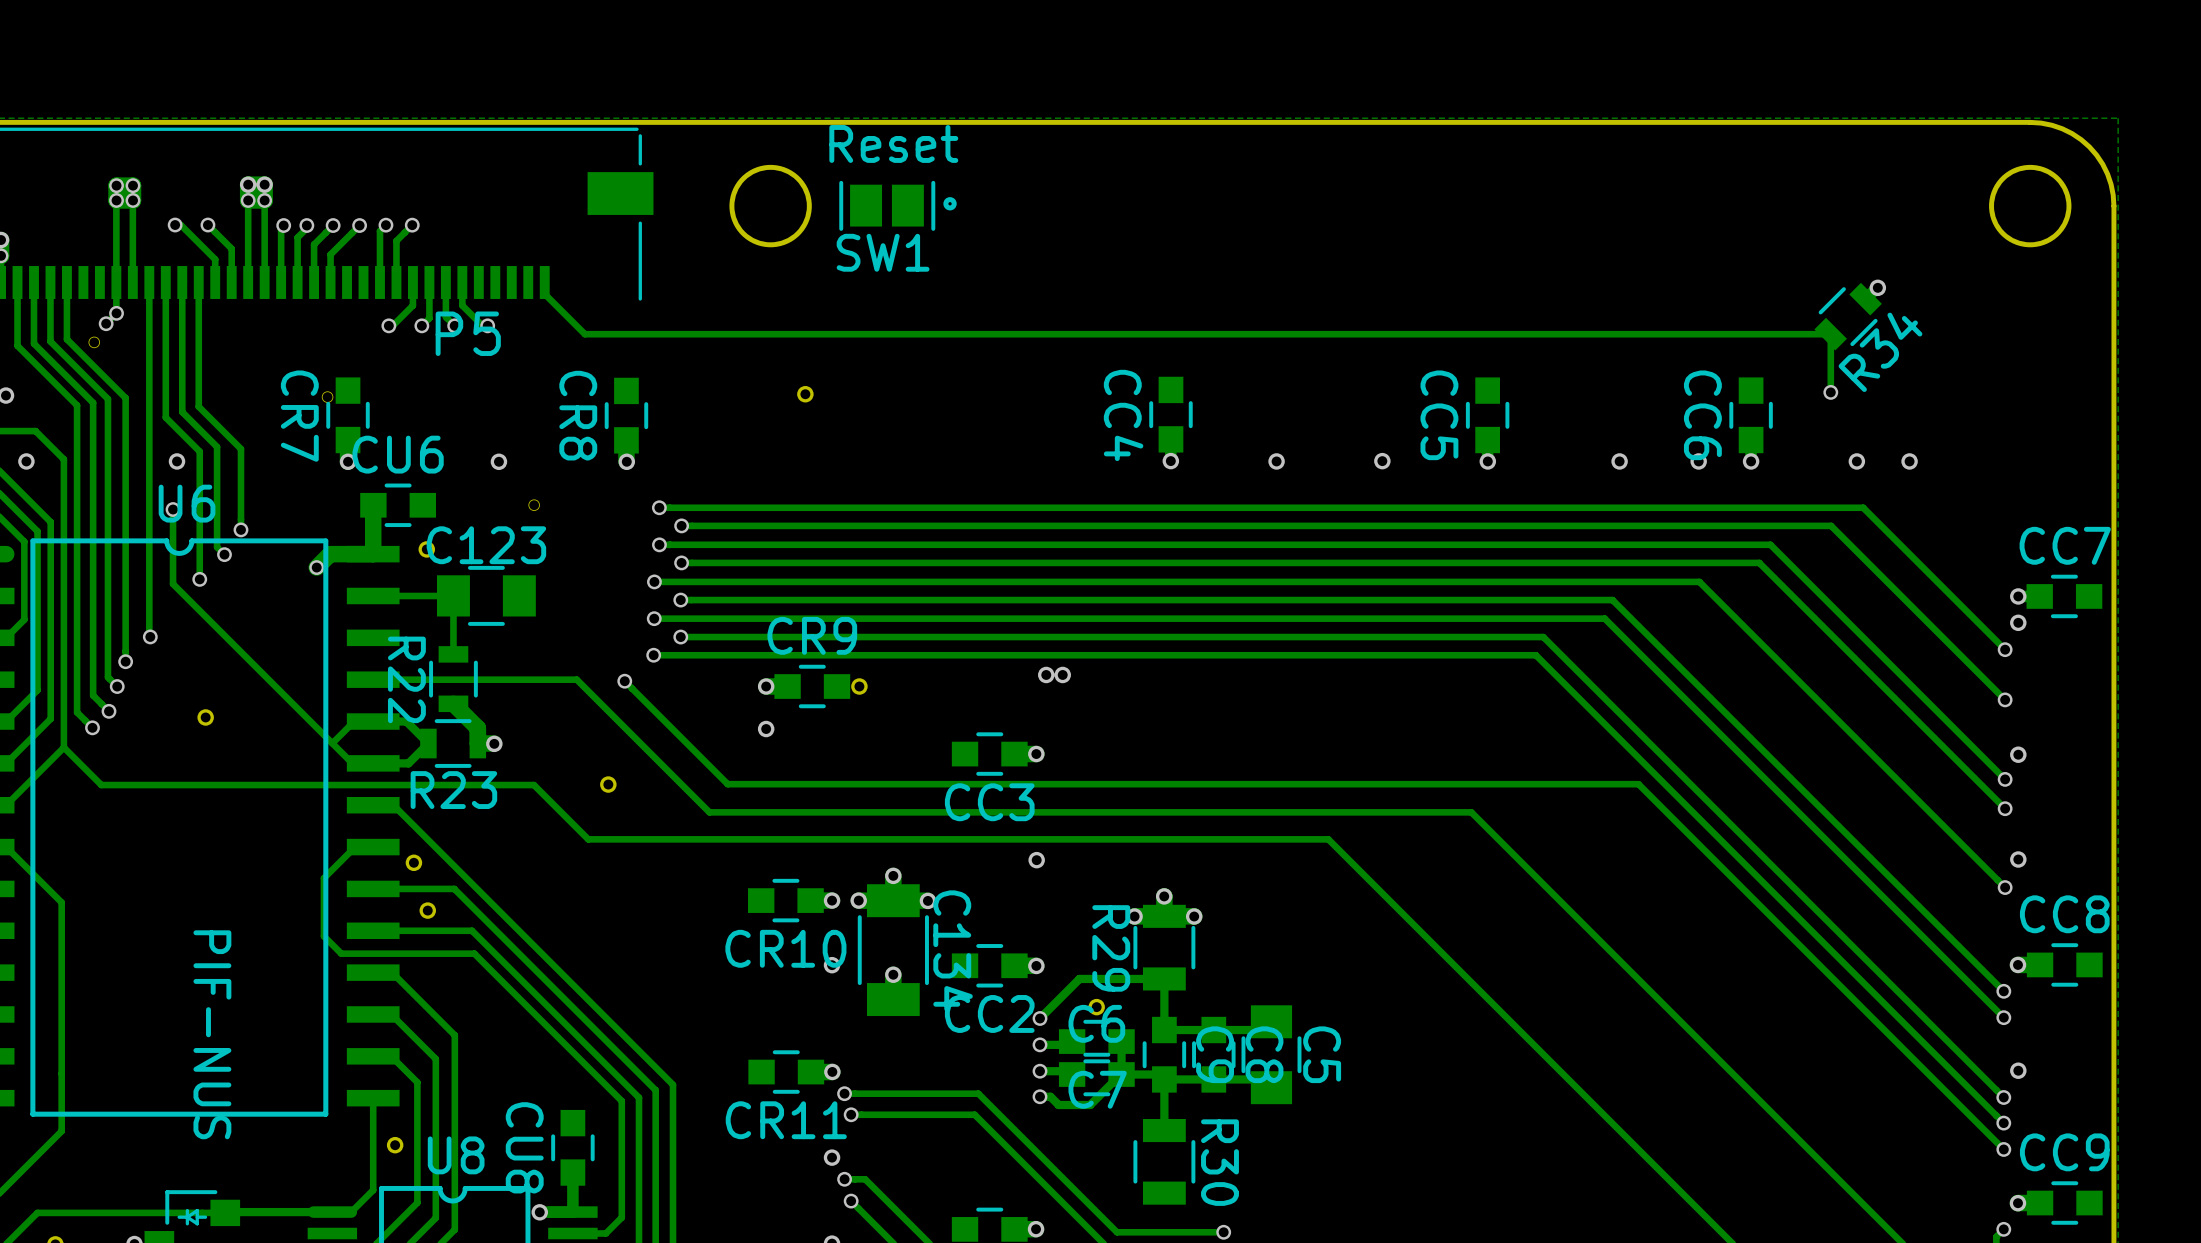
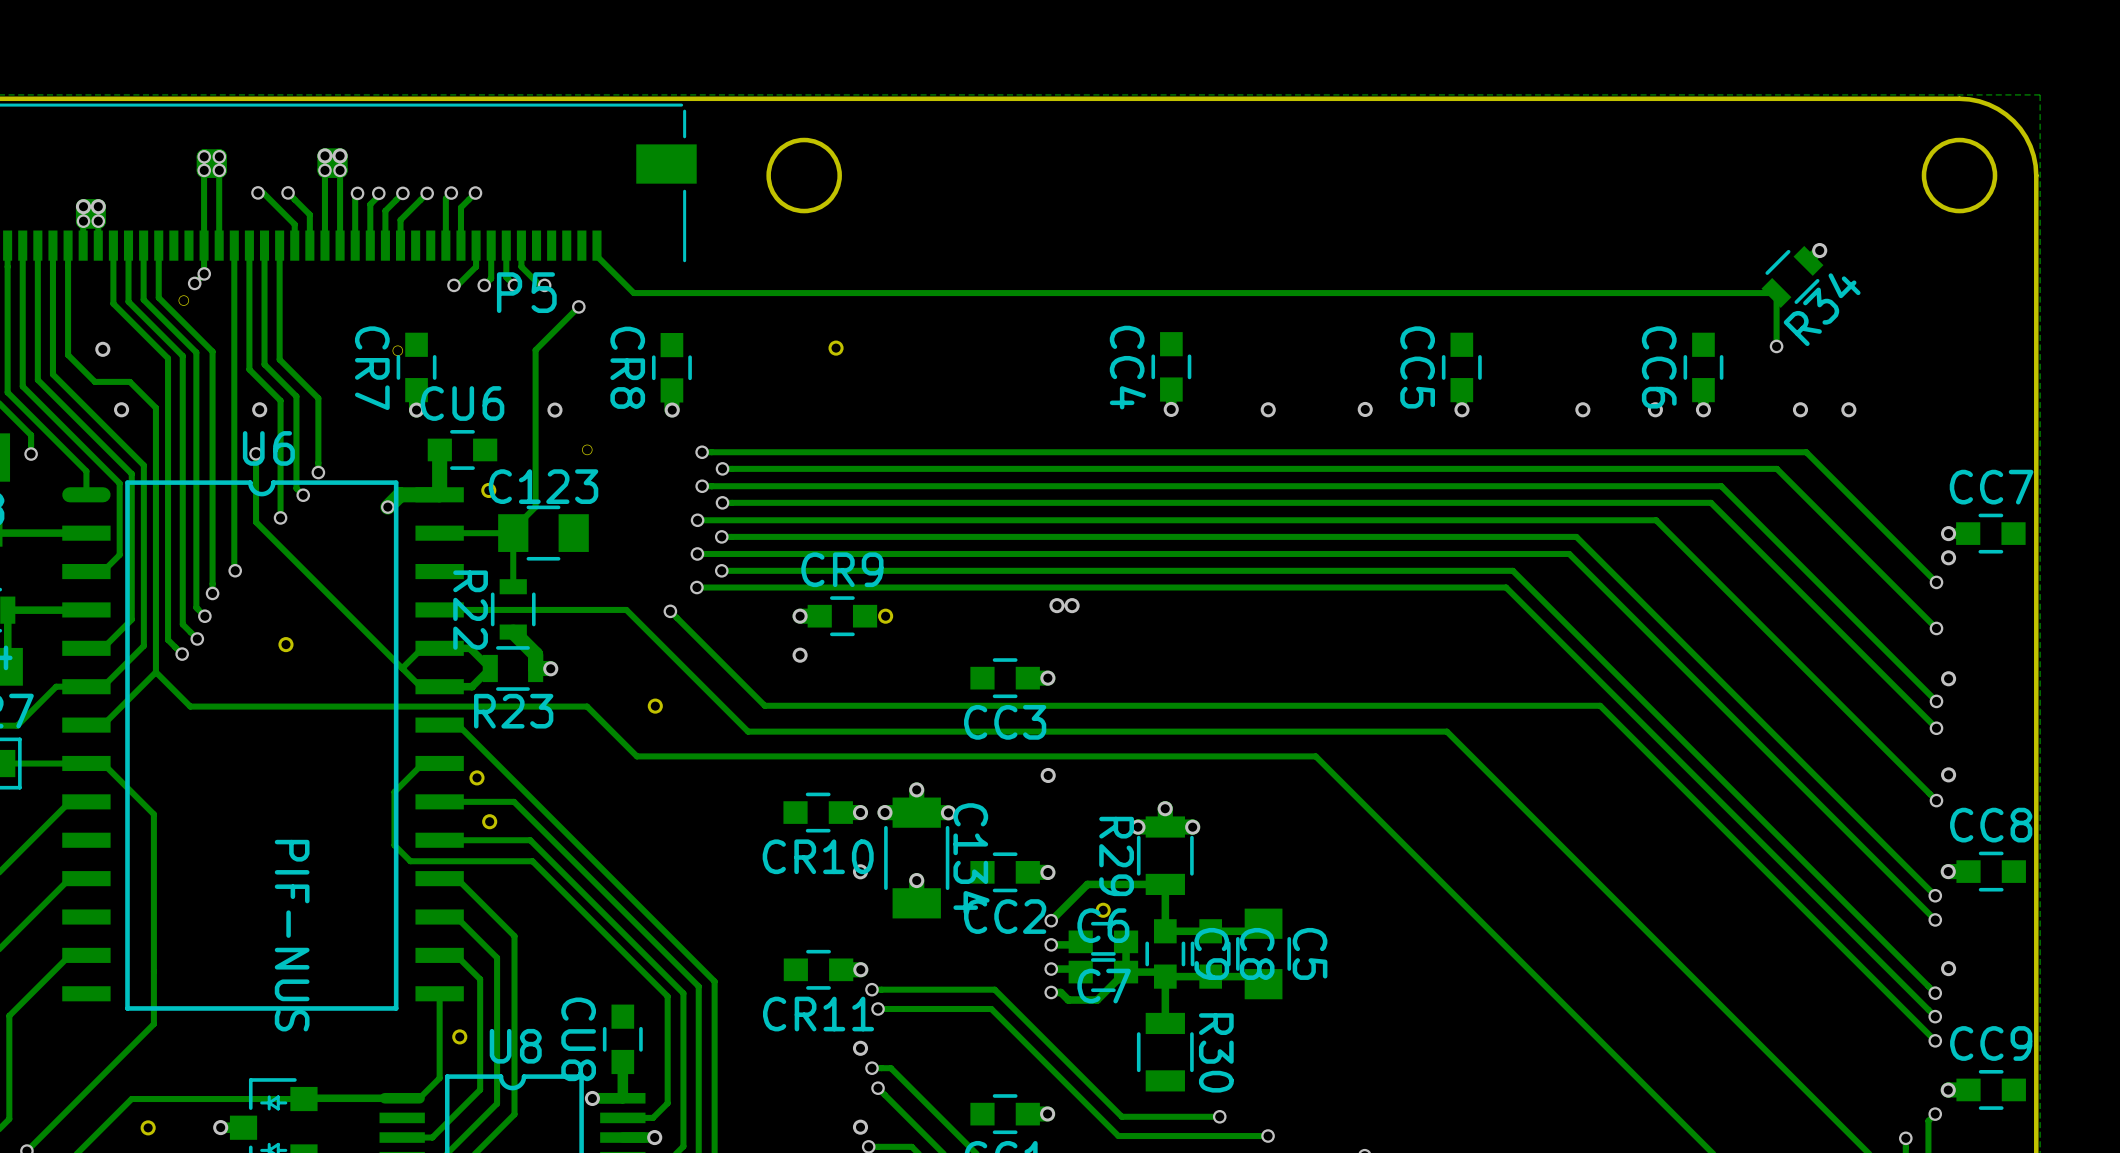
SW1: Reset (897, 205) -> none
track: none -> (578, 306) (535, 350) (535, 506) (513, 529) (513, 533)
via: none -> (578, 306)

